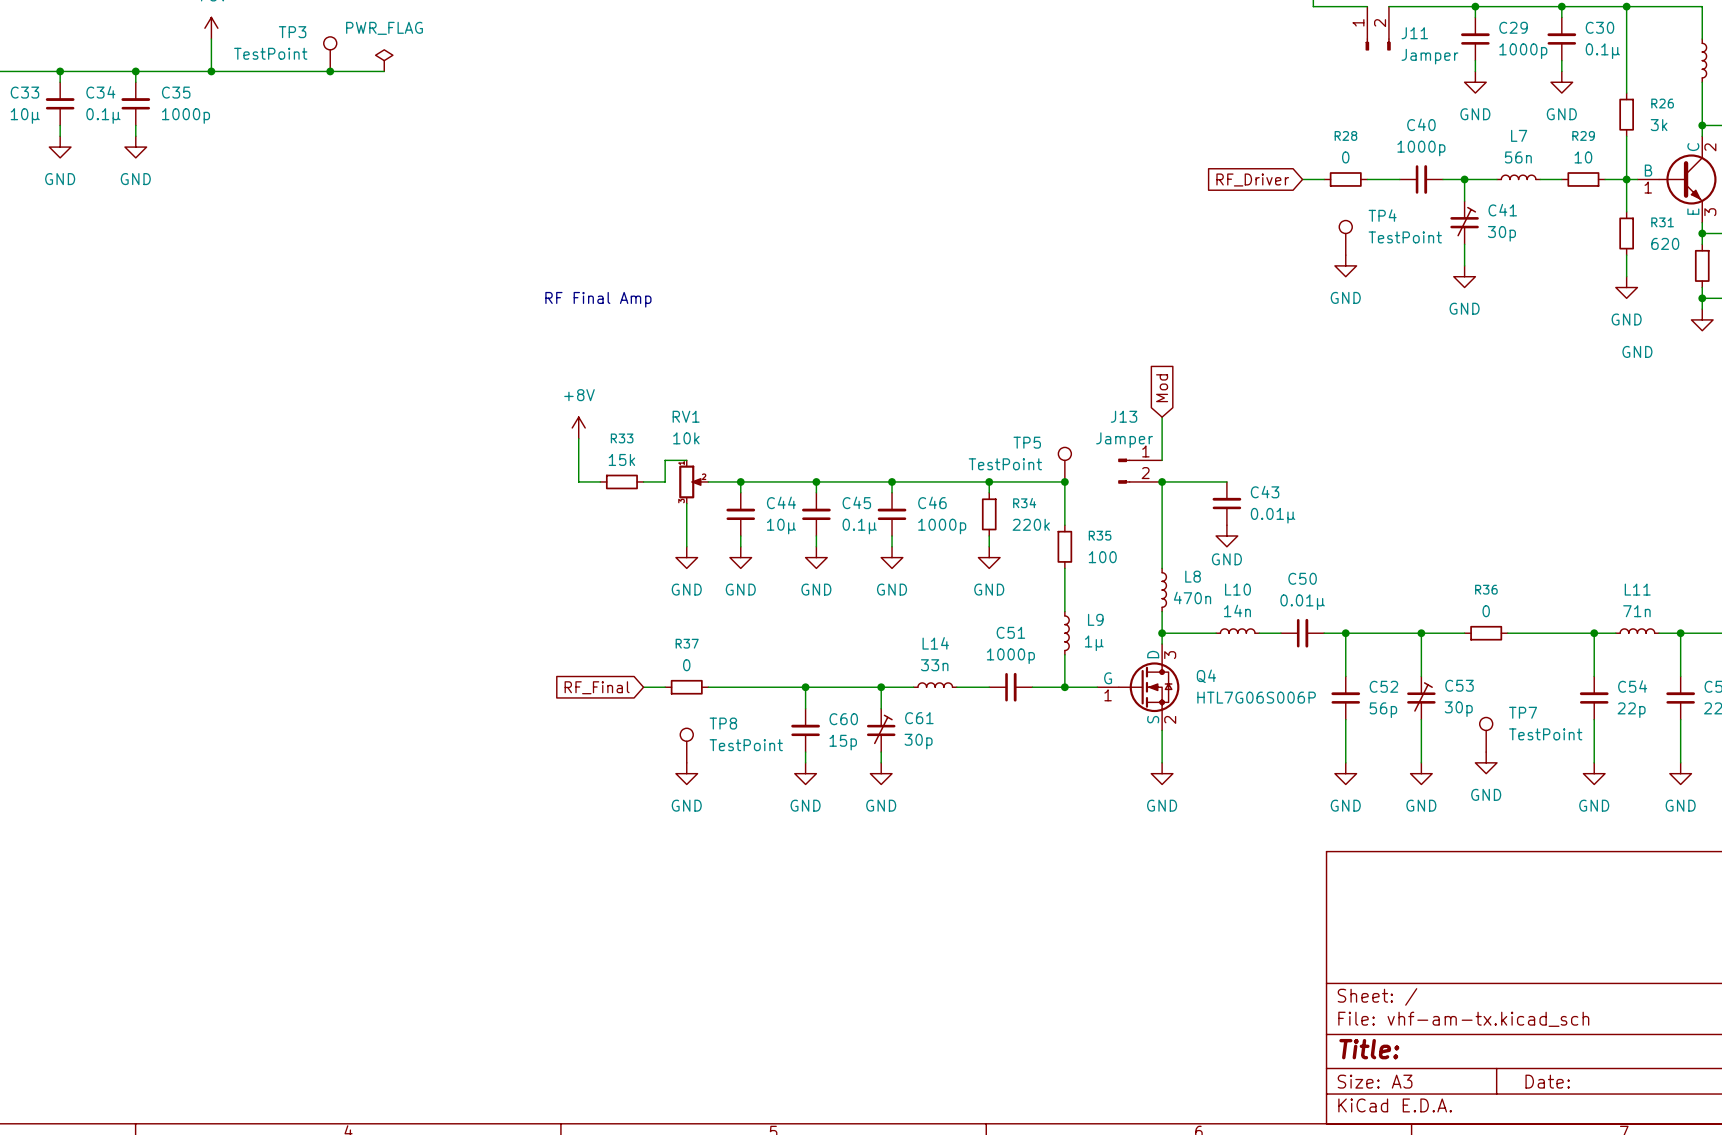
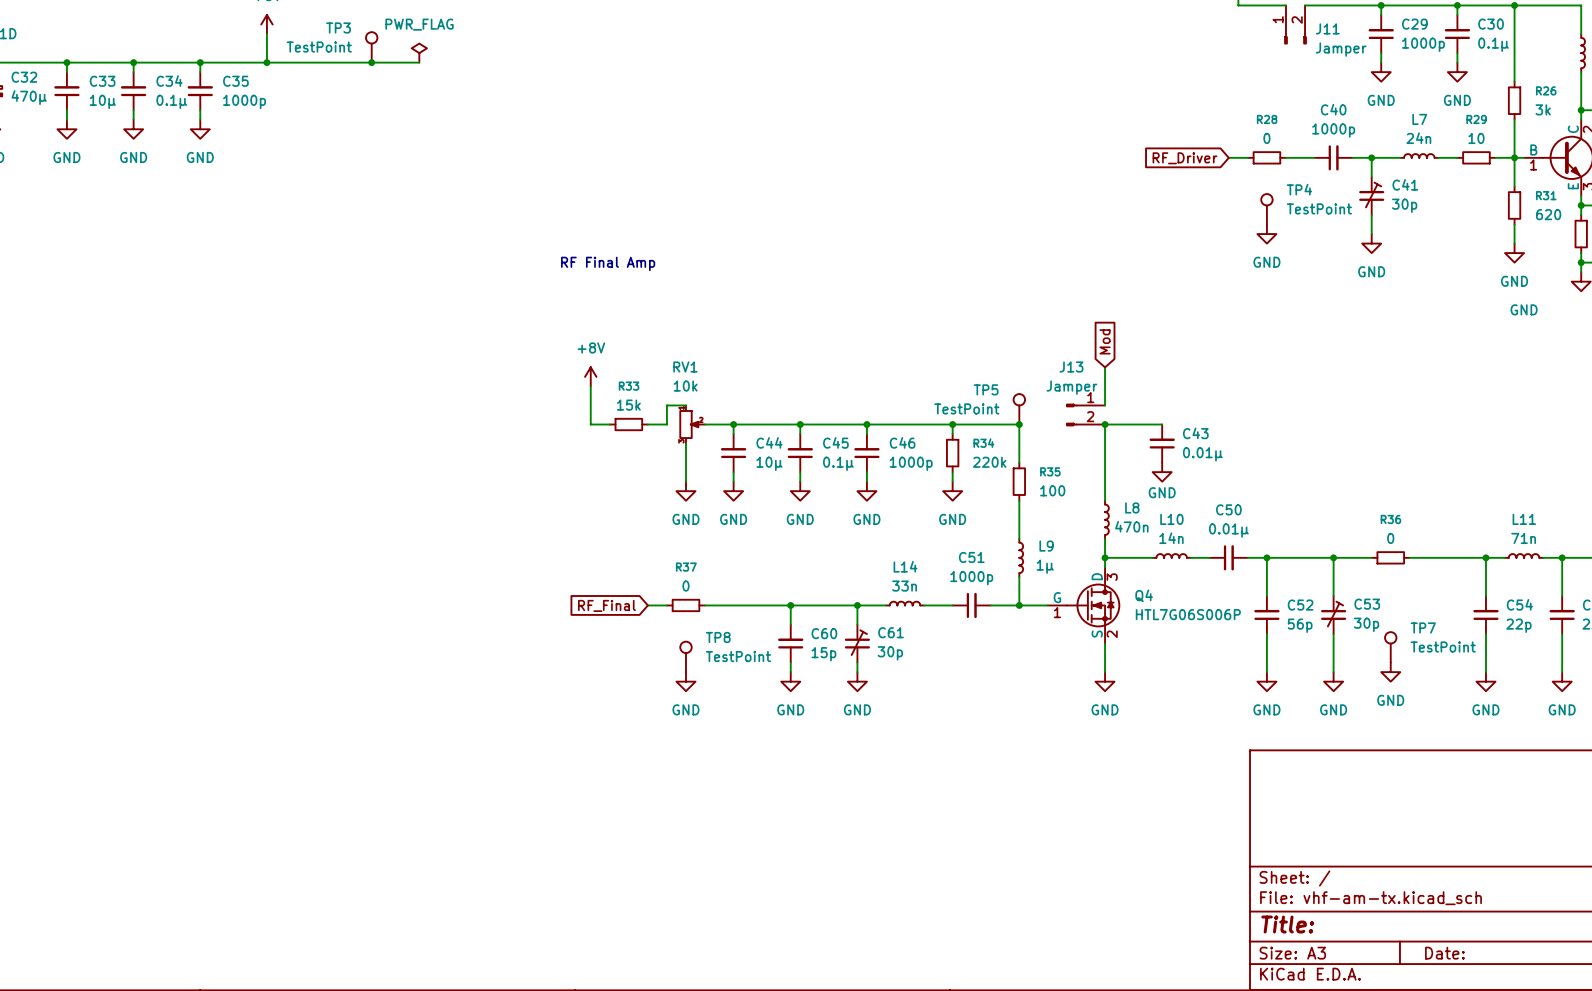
L7 value: 56n (1518, 157) -> 24n (1418, 138)

